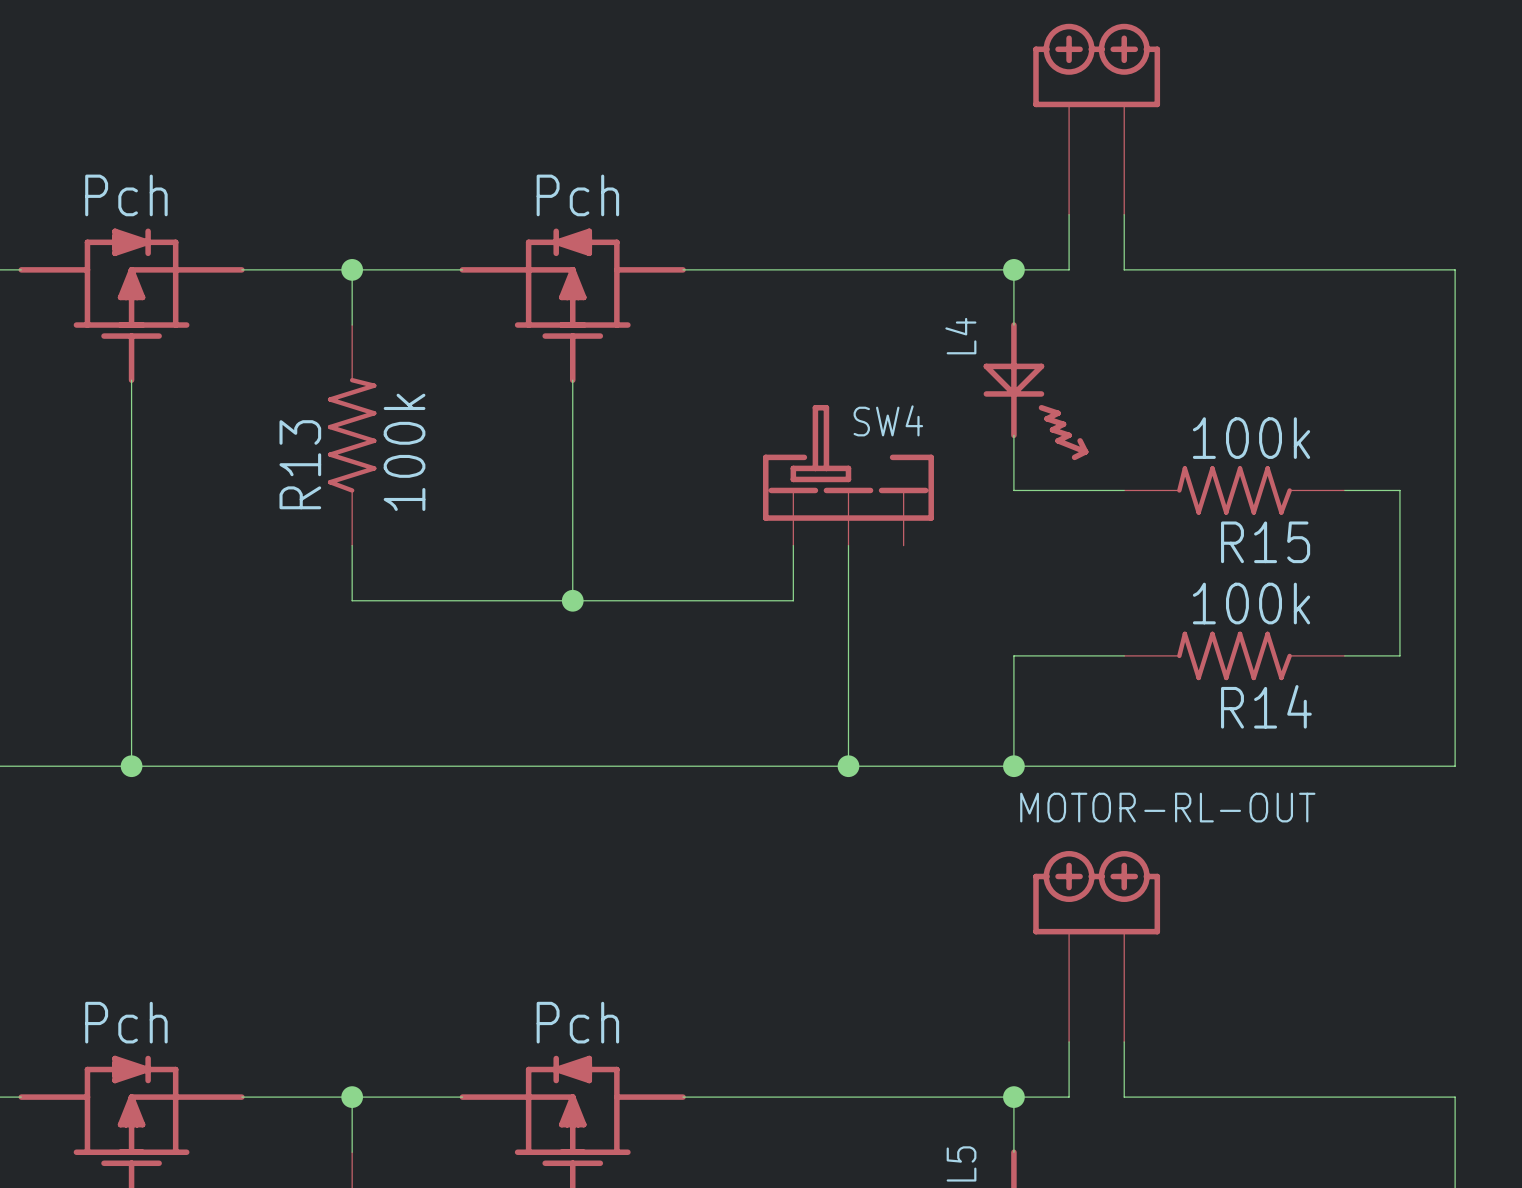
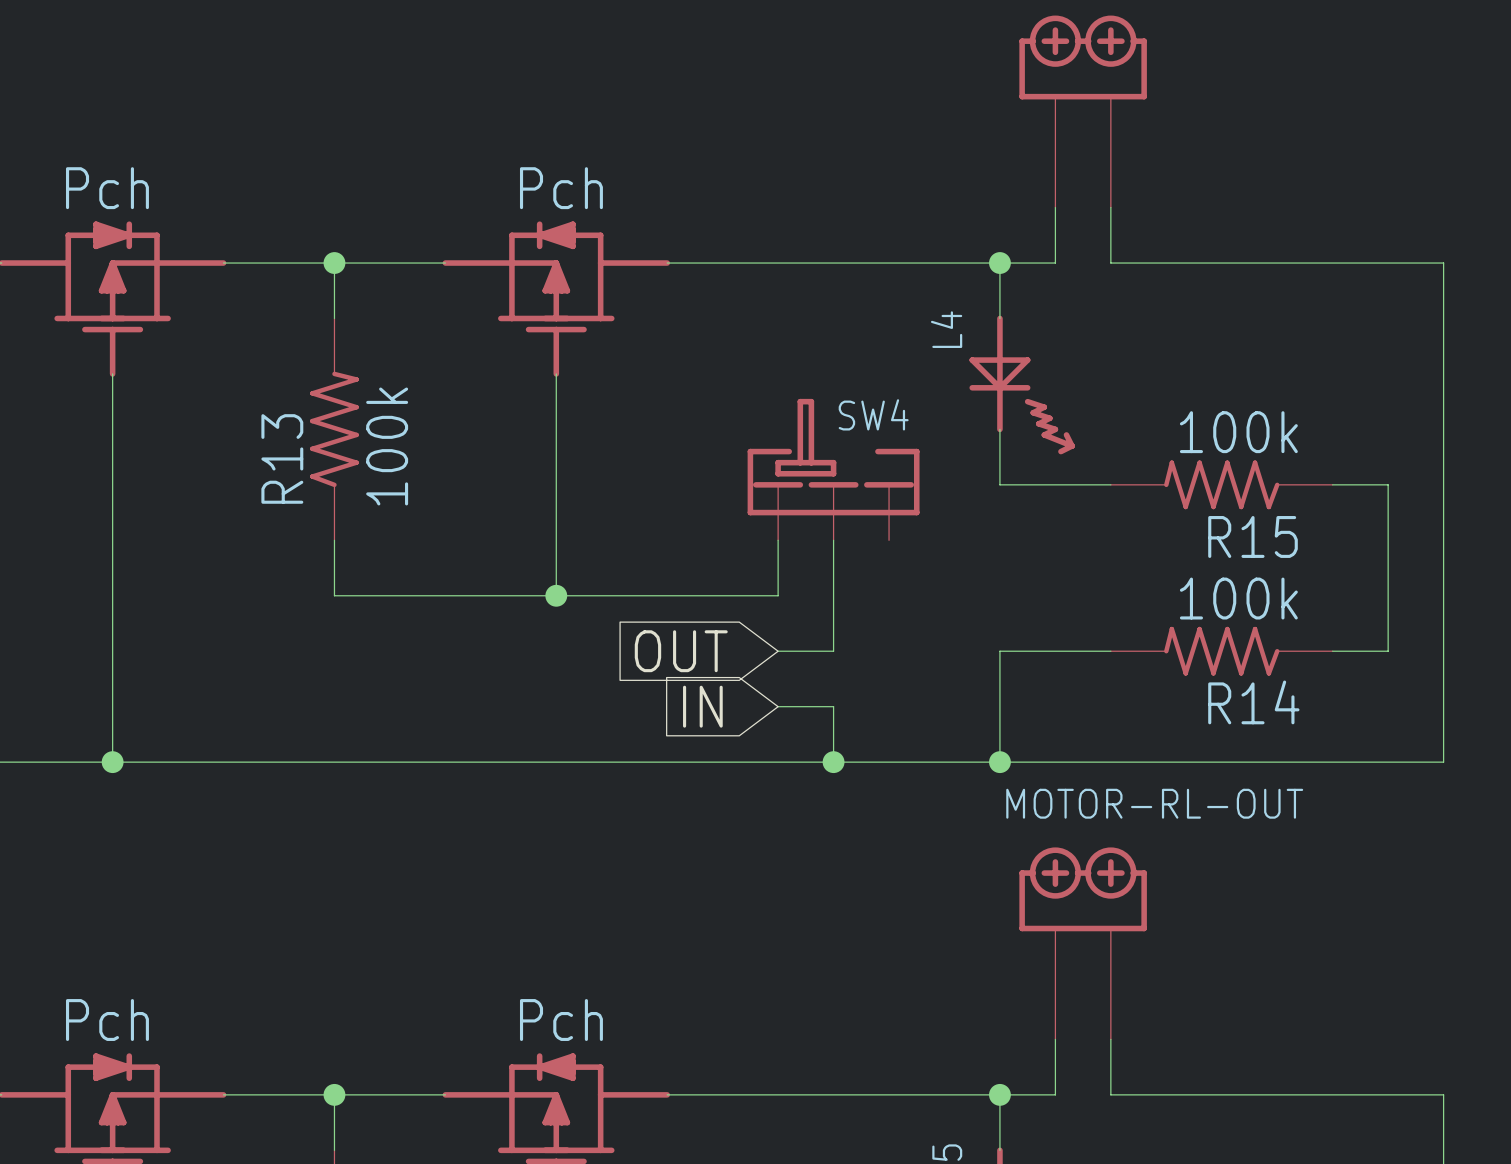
global label: none -> OUT (681, 651)
wire: (848, 655) (848, 711) -> (833, 651) (778, 651)
global label: none -> IN (702, 706)
wire: none -> (778, 706) (833, 706)

